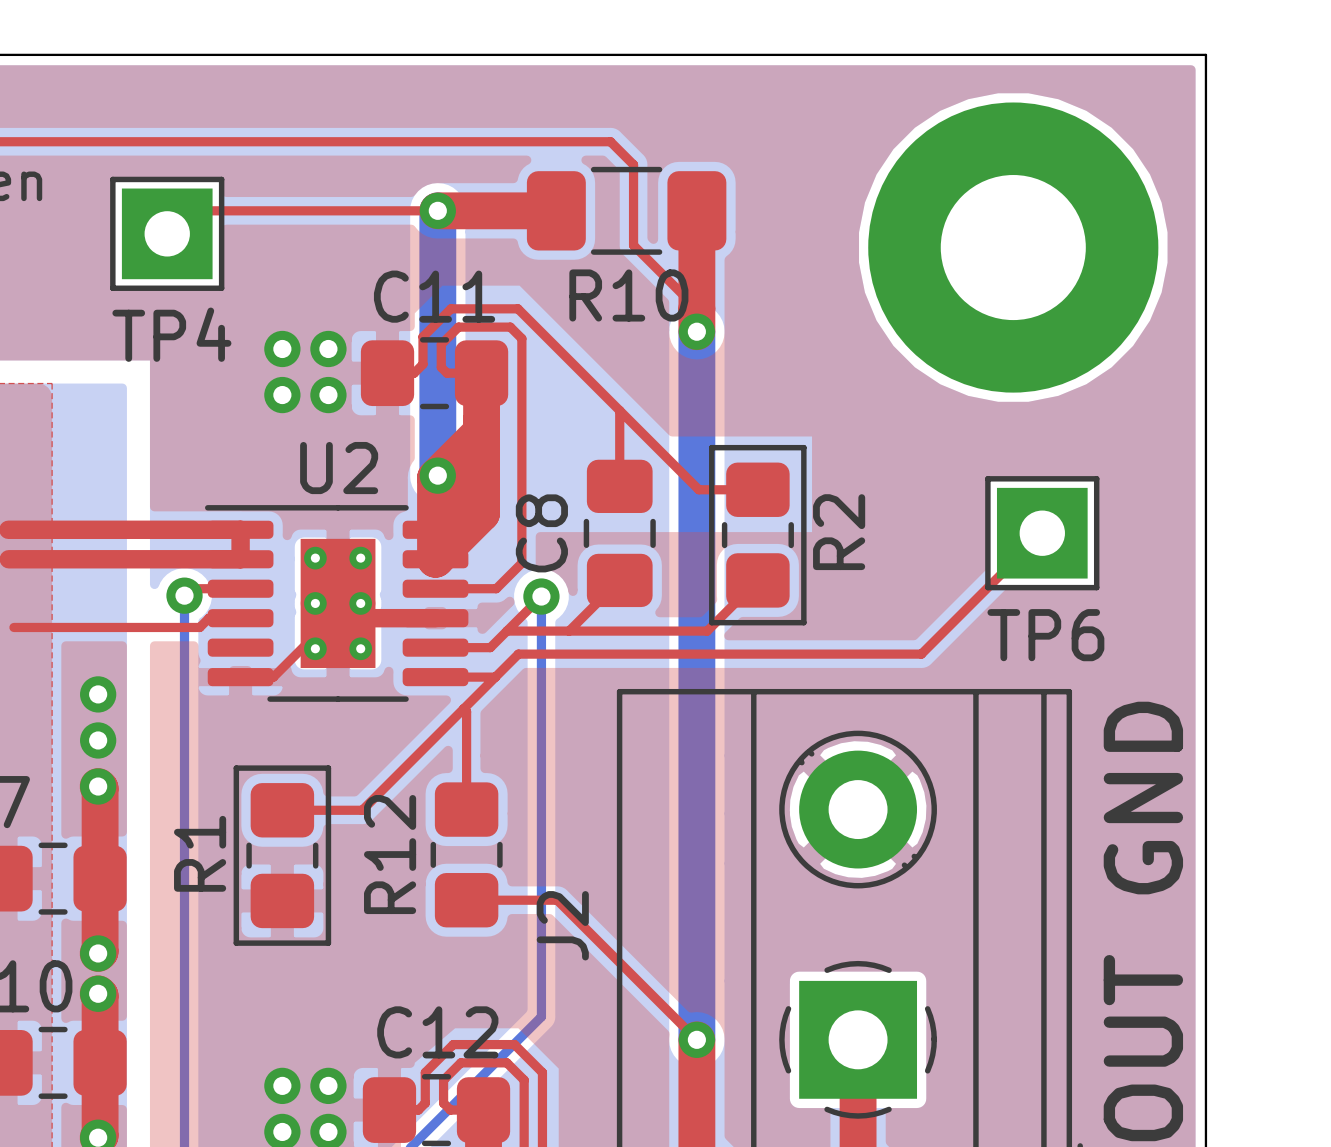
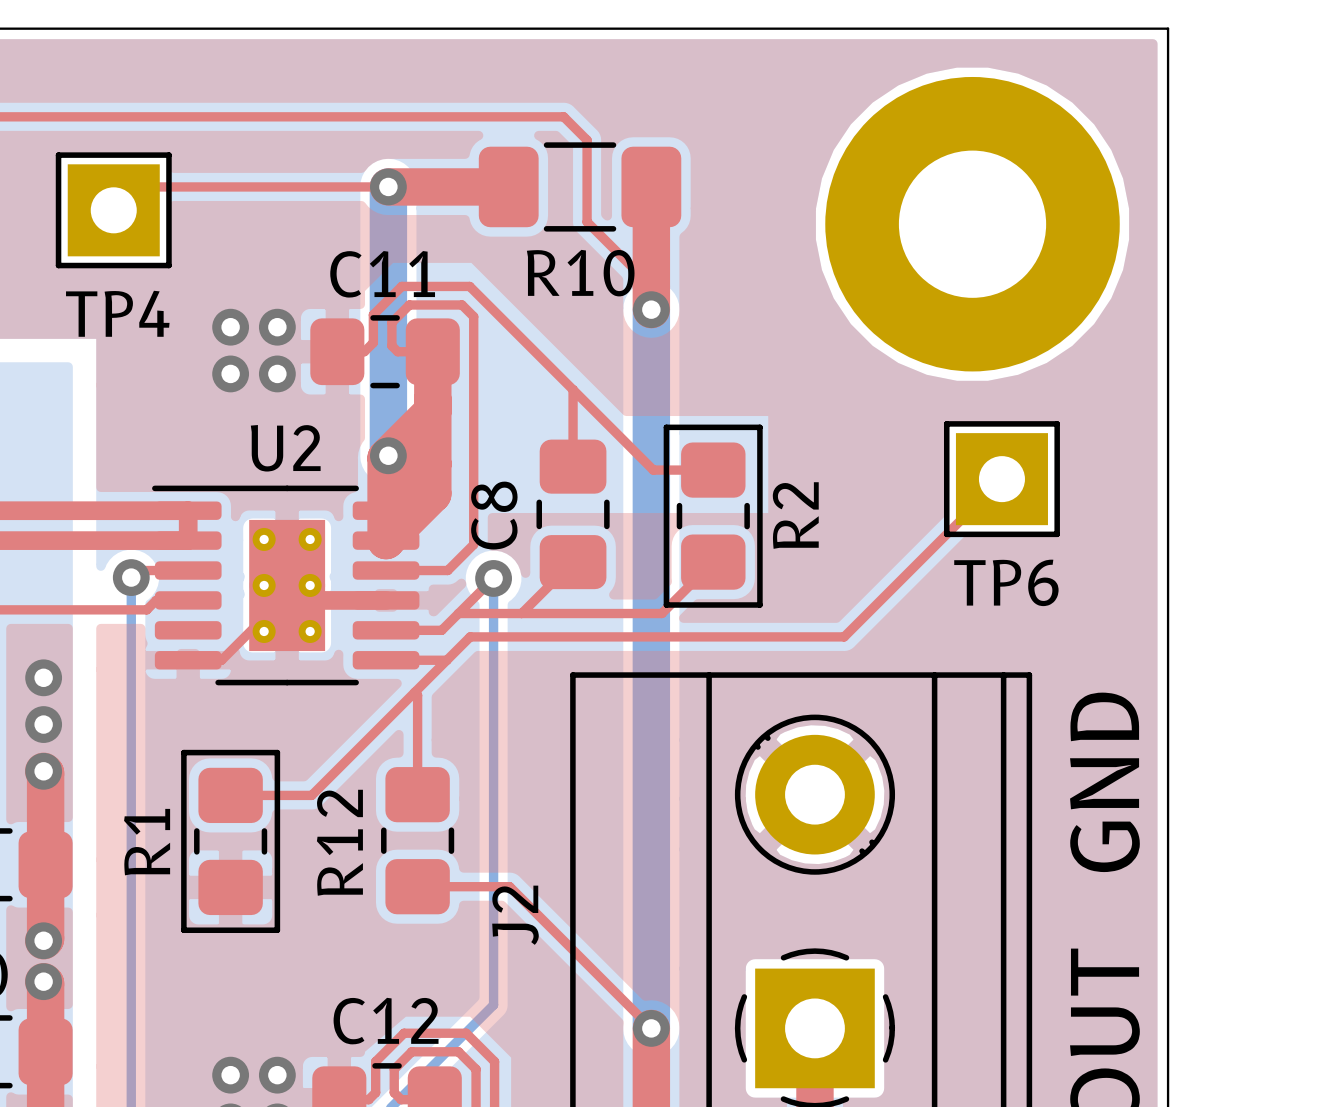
top track: (1042, 533) (921, 654) (886, 654) -> (1001, 479) (844, 636)
TP6 position: (1042, 533) -> (1001, 479)

